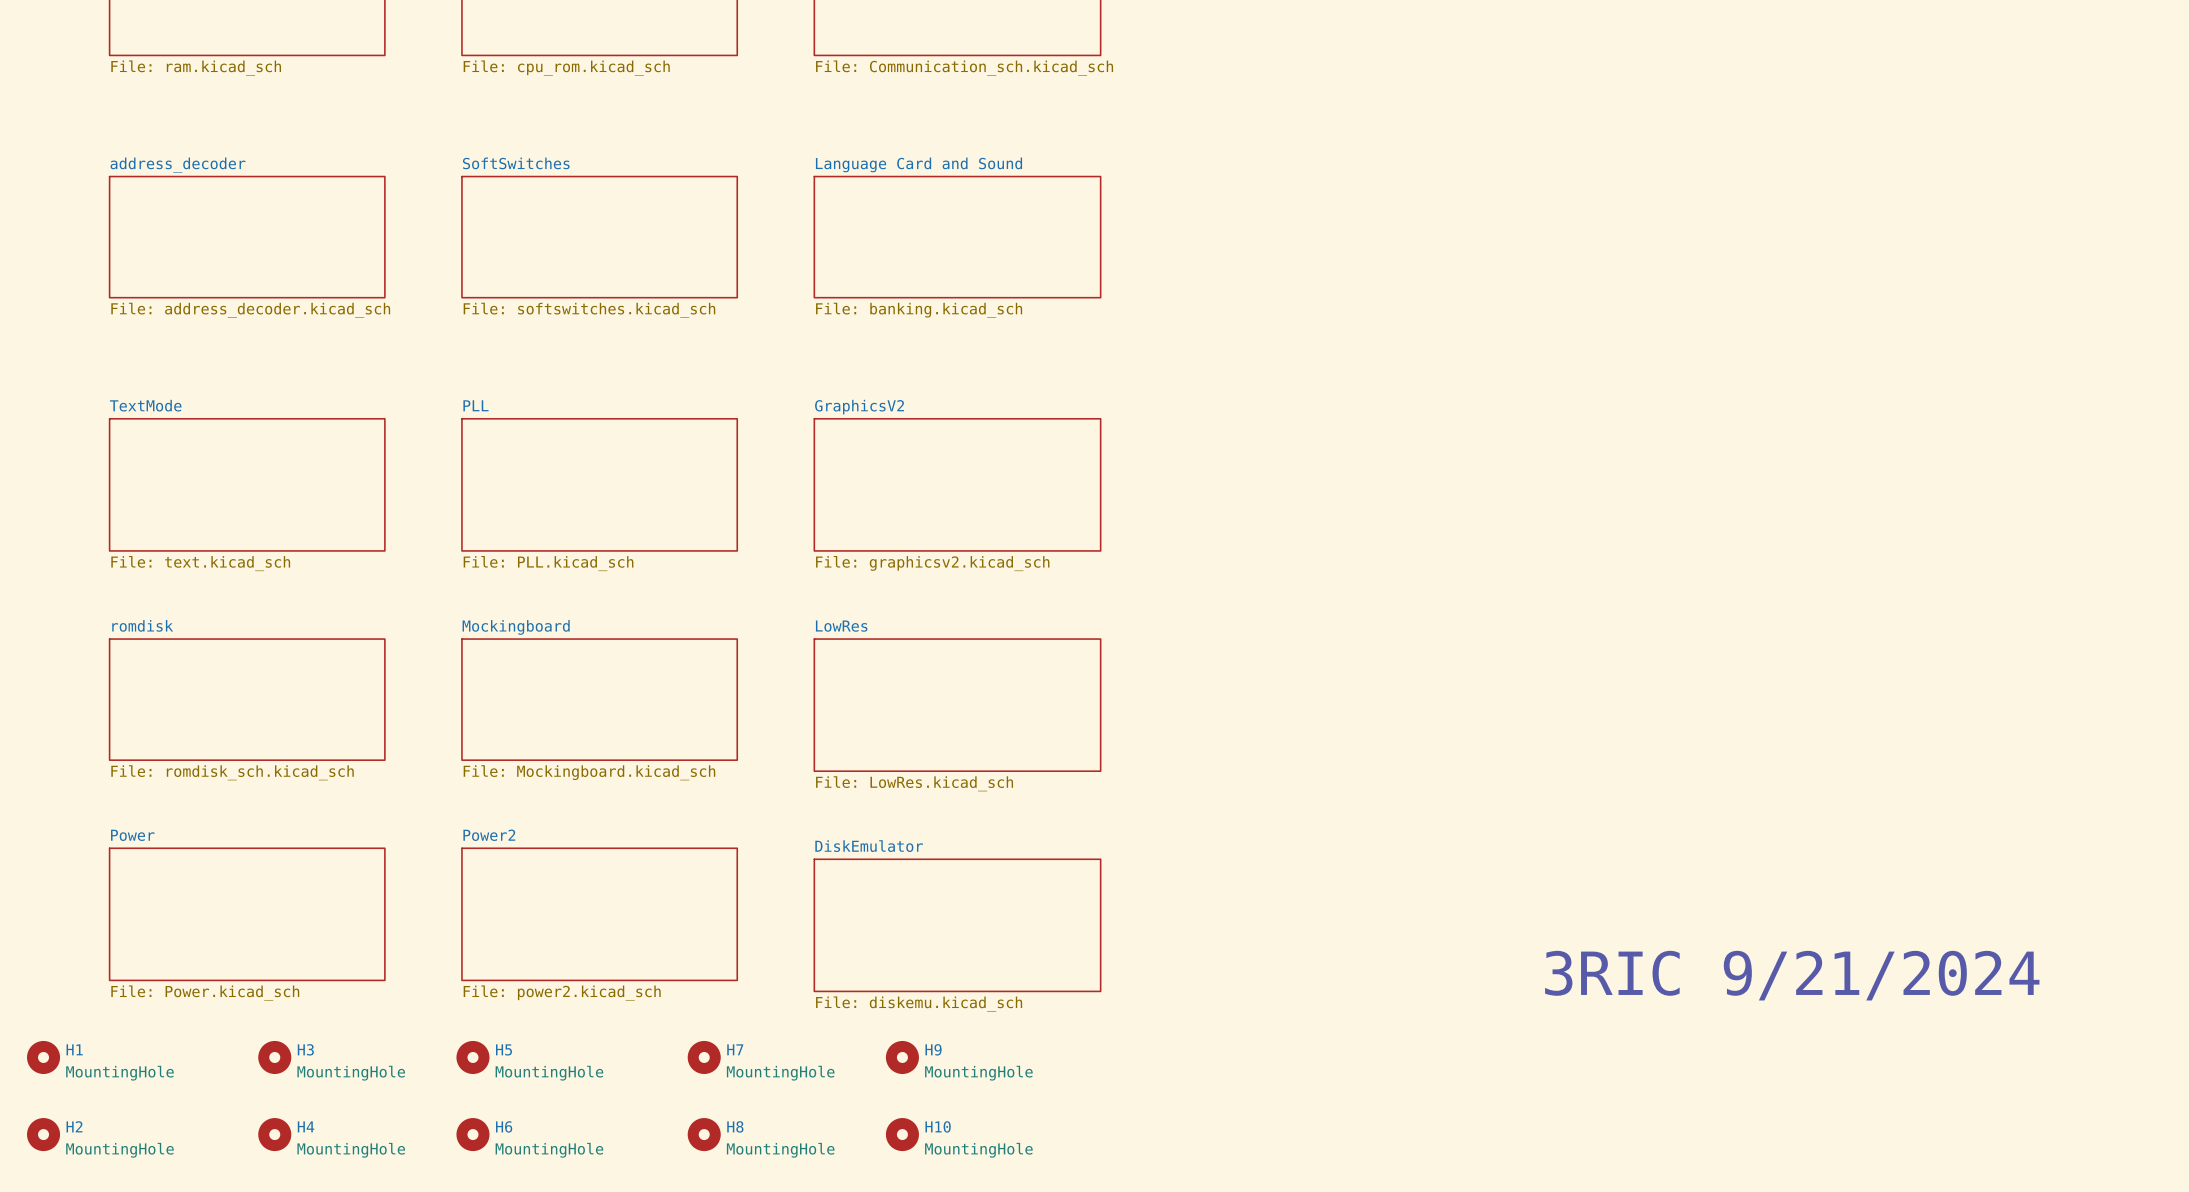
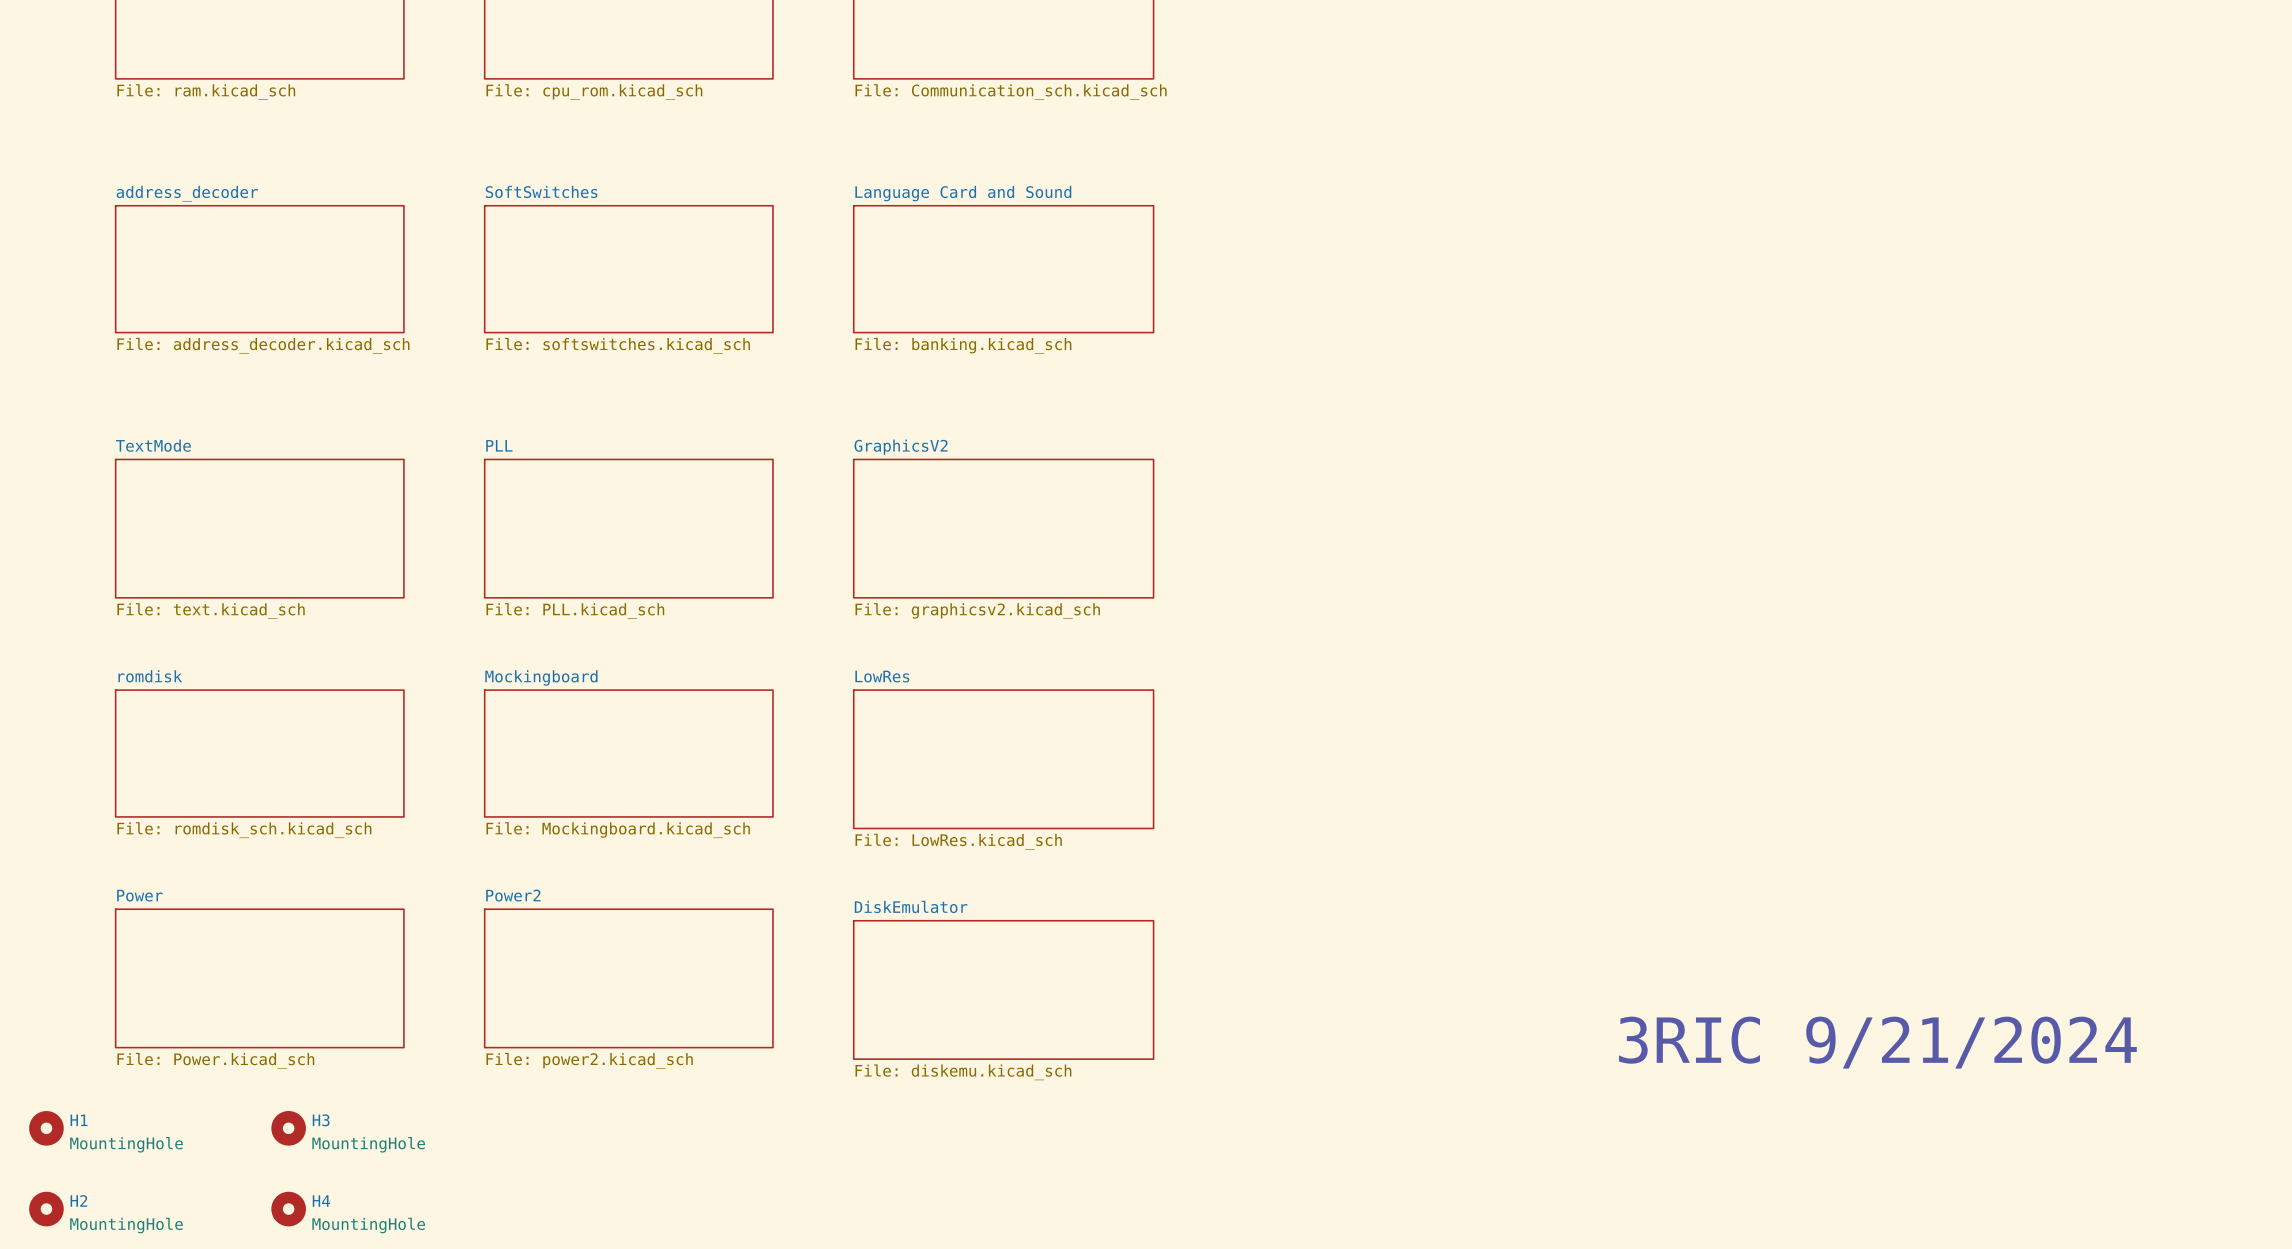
H5: MountingHole (472, 1057) -> none
H7: MountingHole (704, 1057) -> none
H9: MountingHole (902, 1057) -> none
H6: MountingHole (472, 1134) -> none
H8: MountingHole (704, 1134) -> none
H10: MountingHole (902, 1134) -> none

